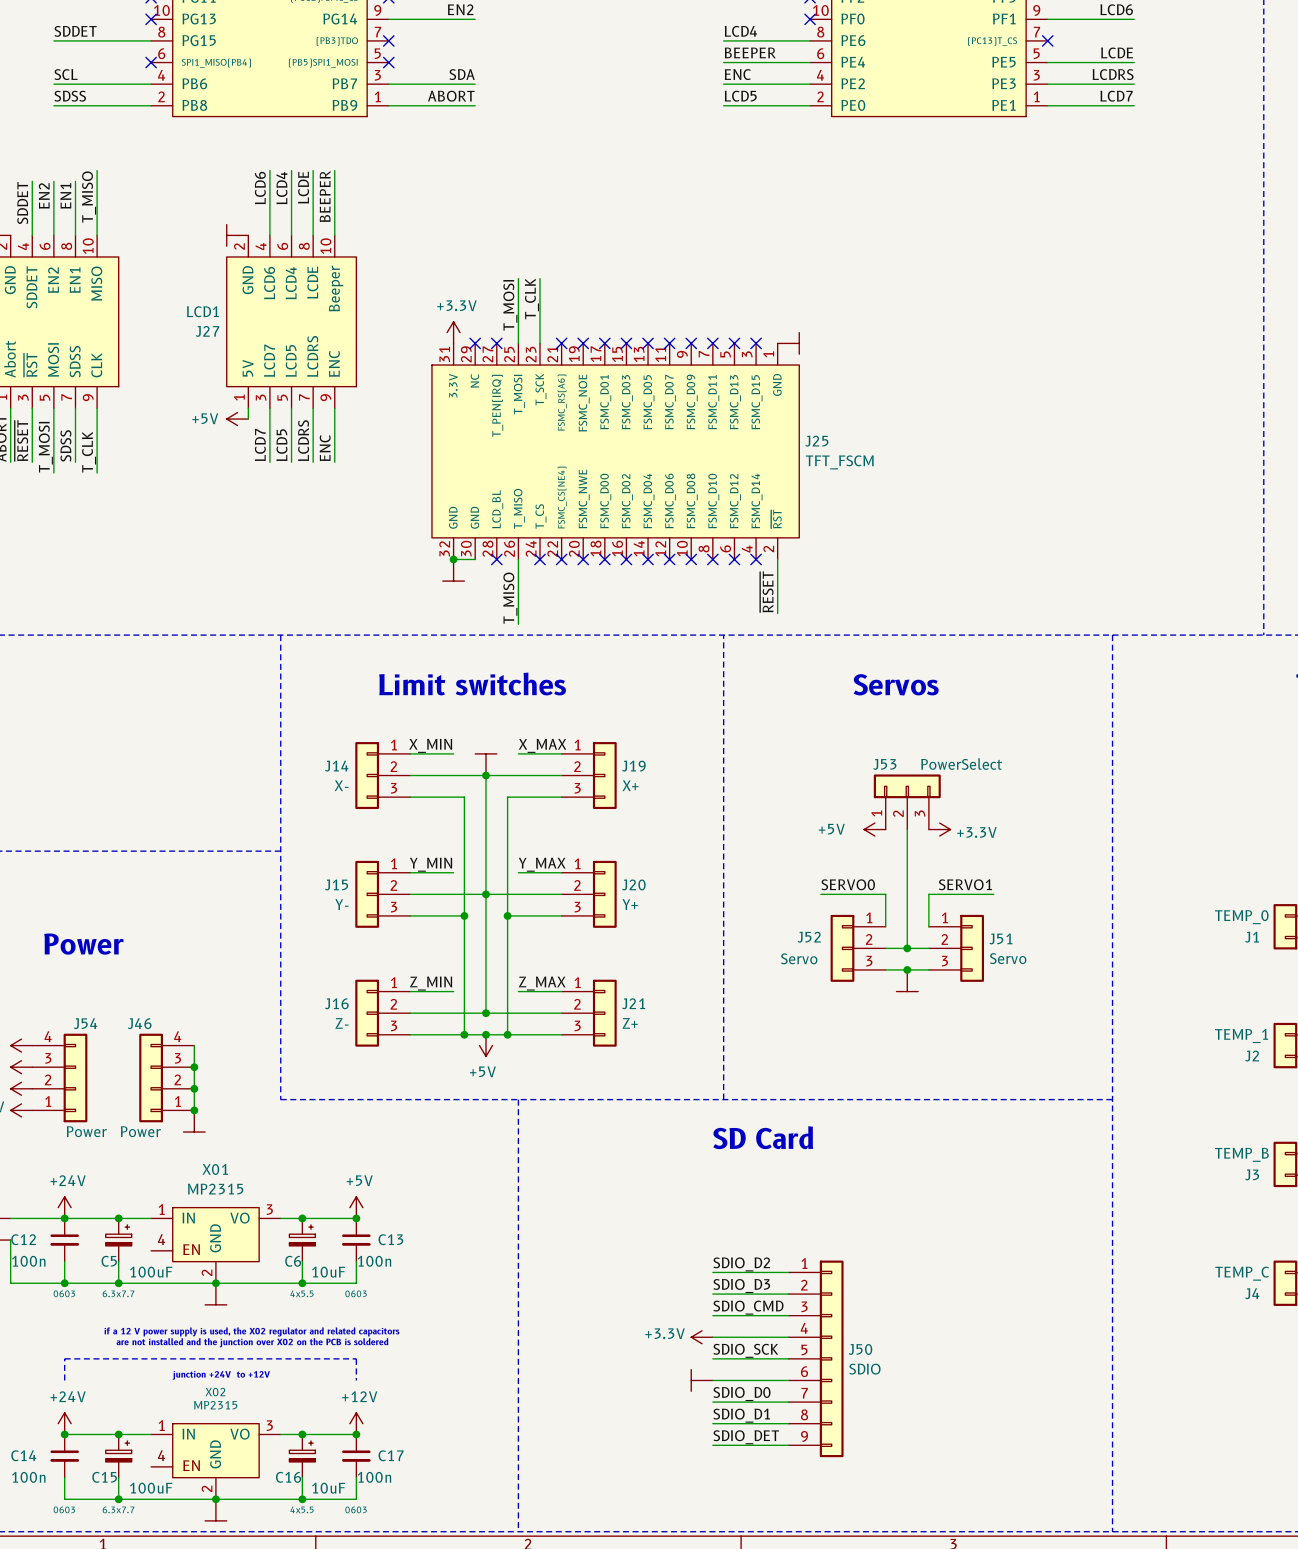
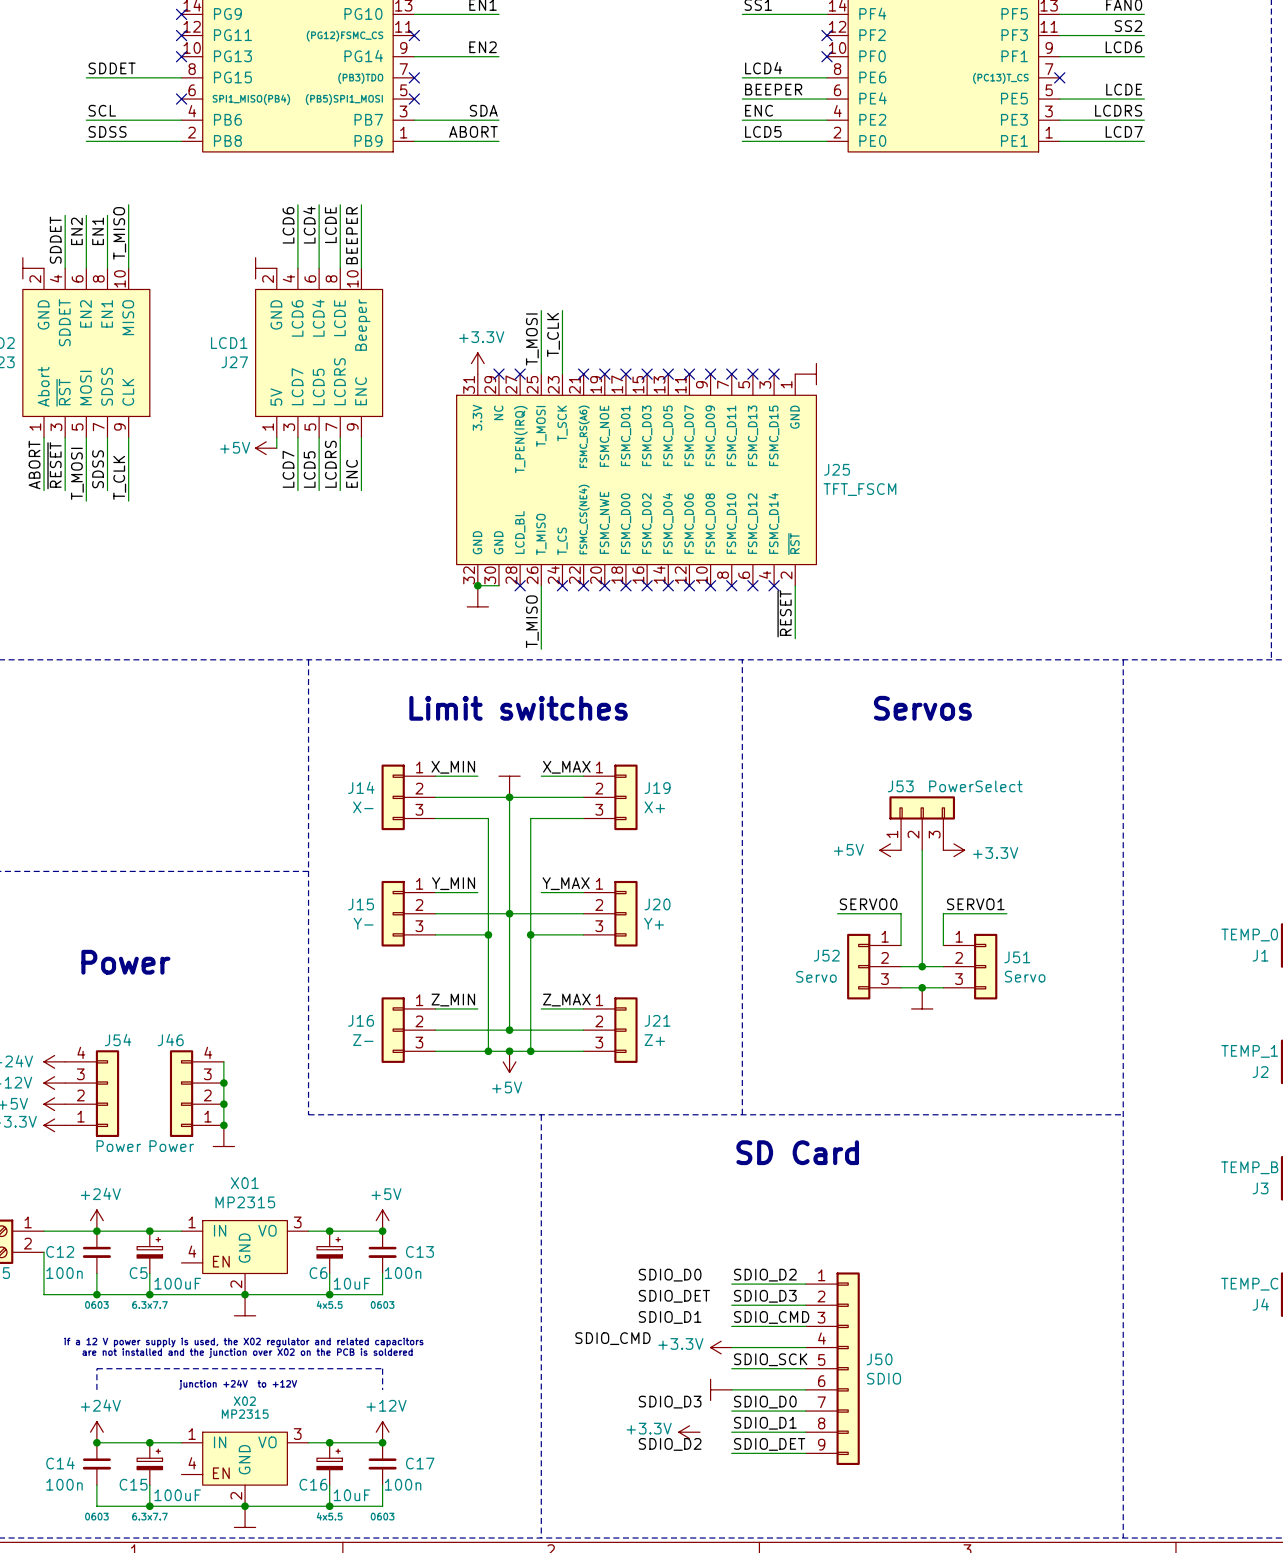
label: none -> SDIO_D0 (670, 1275)
label: none -> SDIO_DET (674, 1296)
label: none -> SDIO_D1 (670, 1317)
label: none -> SDIO_CMD (612, 1338)
label: none -> SDIO_D3 (670, 1402)
power symbol: none -> +3.3V (689, 1432)
label: none -> SDIO_D2 (670, 1444)

